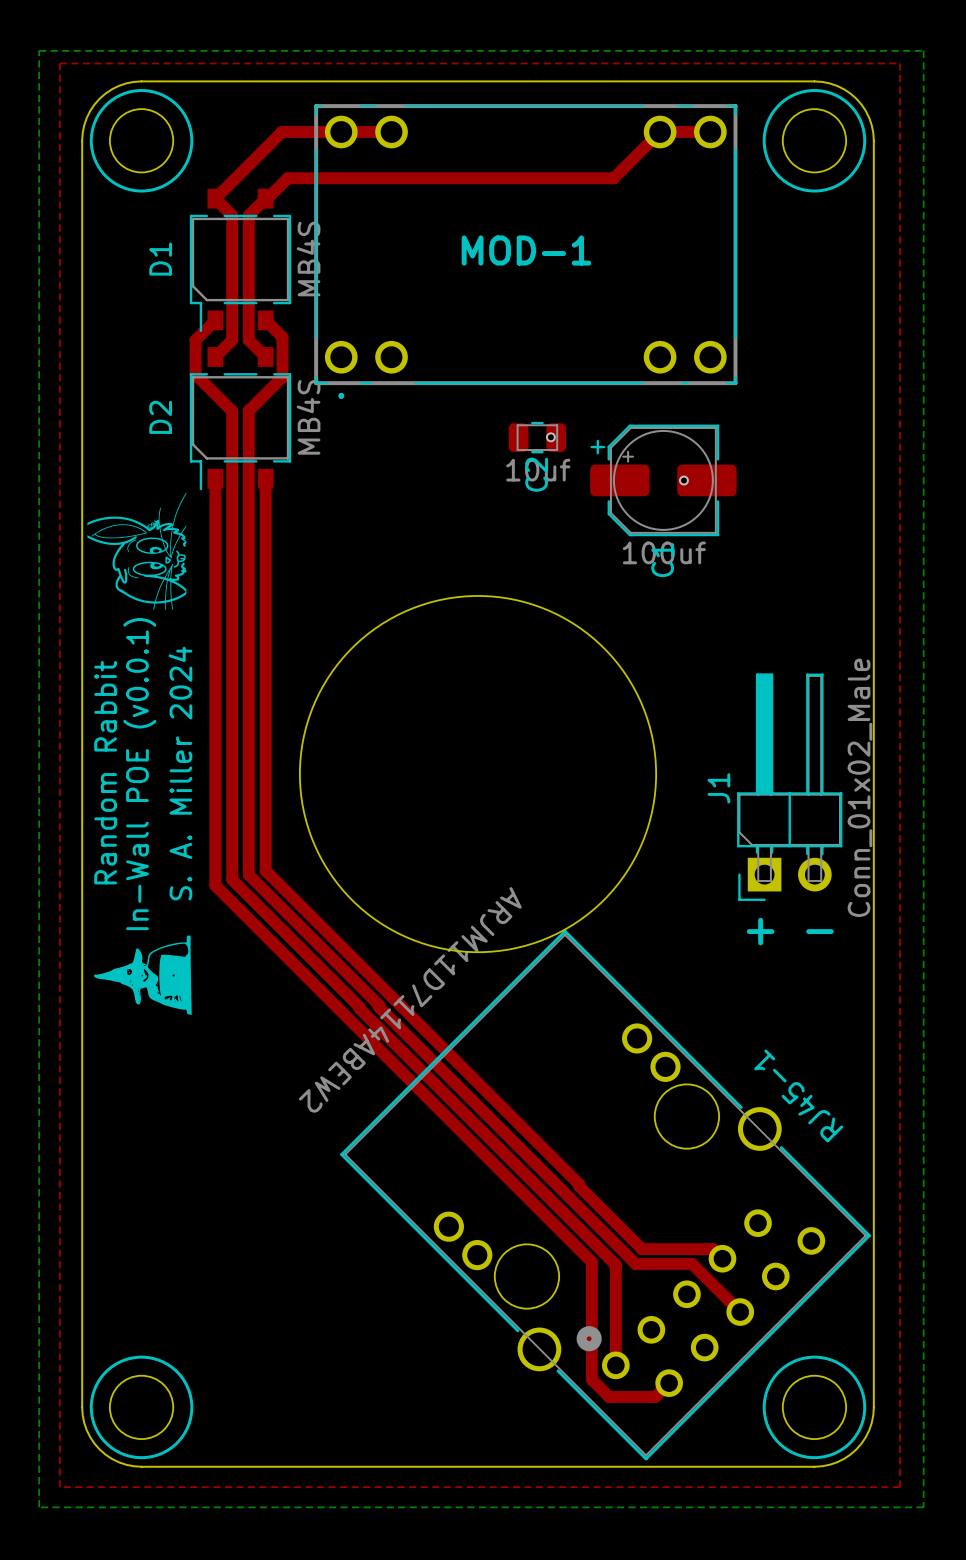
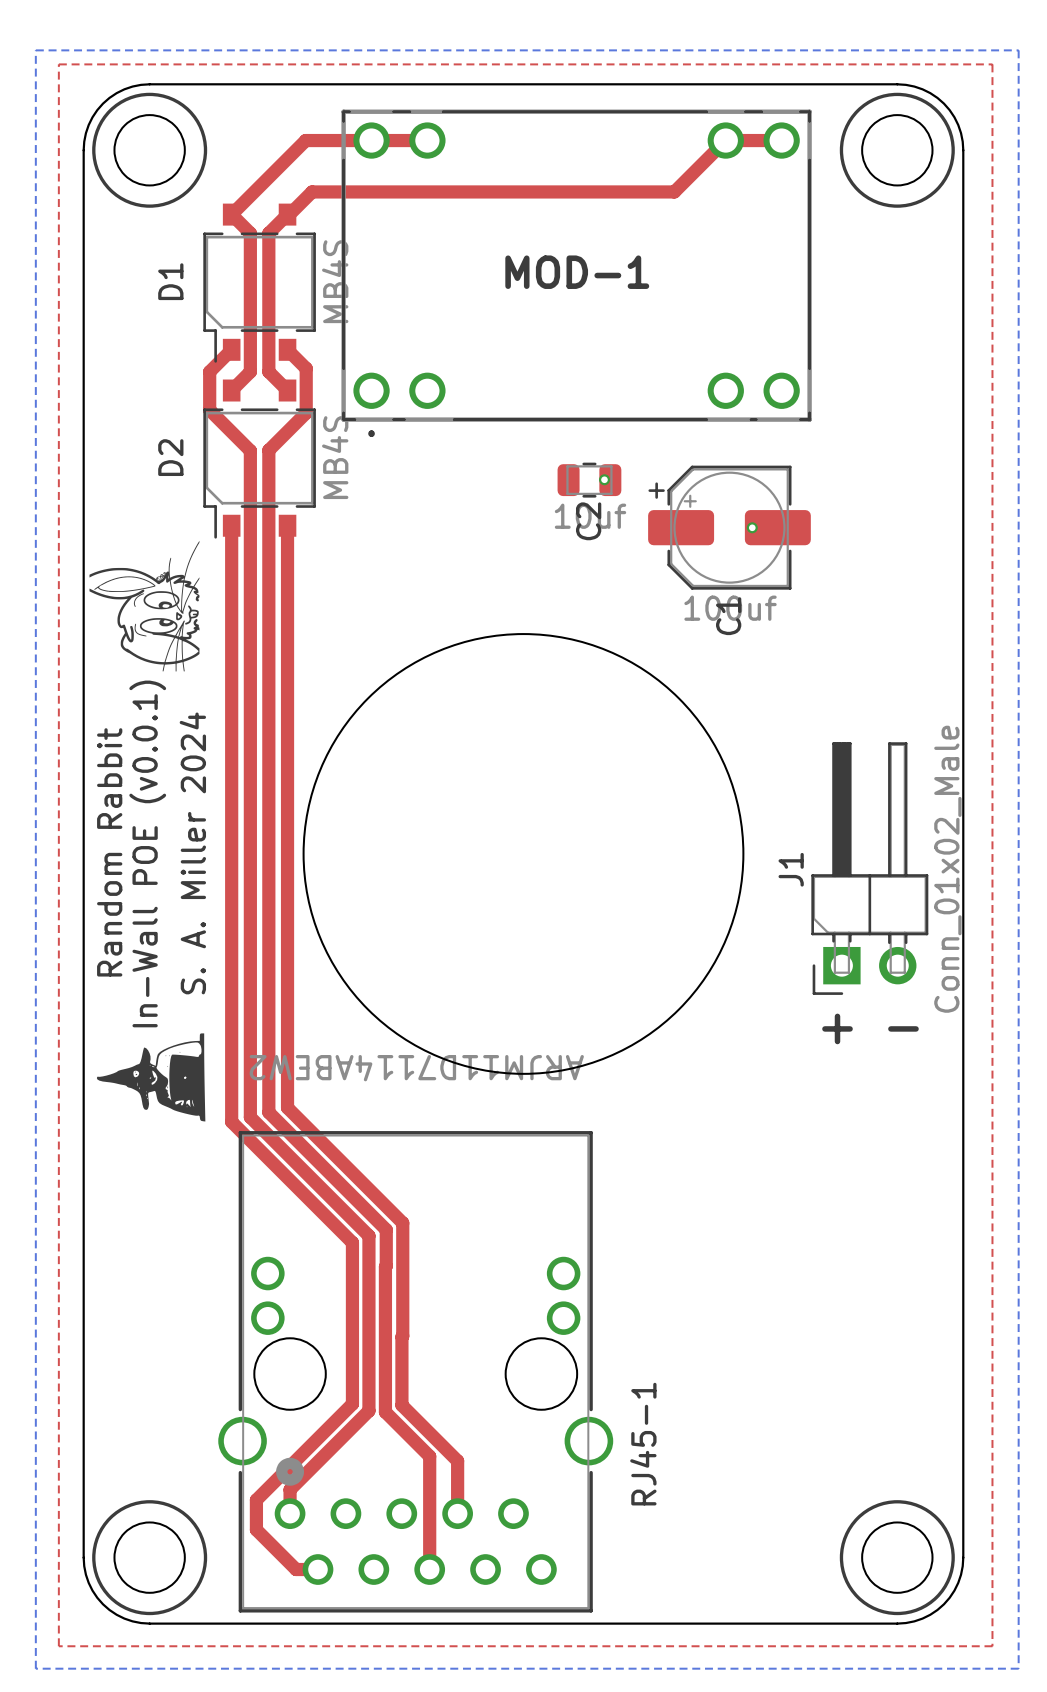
round board edge size: [299, 595, 657, 953] -> [303, 633, 744, 1075]
top track: (265, 870) (641, 1249) (712, 1249) (722, 1258) -> (287, 961) (287, 1107) (402, 1223) (401, 1405) (457, 1460) (457, 1513)
top track: (248, 874) (635, 1263) (692, 1263) (740, 1312) -> (268, 966) (268, 1112) (386, 1229) (385, 1412) (429, 1456) (429, 1569)
top track: (232, 879) (615, 1265) (615, 1365) -> (250, 971) (250, 1117) (368, 1235) (368, 1410) (290, 1489) (290, 1513)
top track: (215, 885) (591, 1262) (591, 1379) (609, 1396) (655, 1396) (669, 1383) -> (231, 977) (231, 1121) (352, 1242) (352, 1404) (256, 1500) (256, 1529) (296, 1569) (317, 1569)
RJ45-1 rotation: 0° (605, 1195) -> 45° clockwise (415, 1371)

